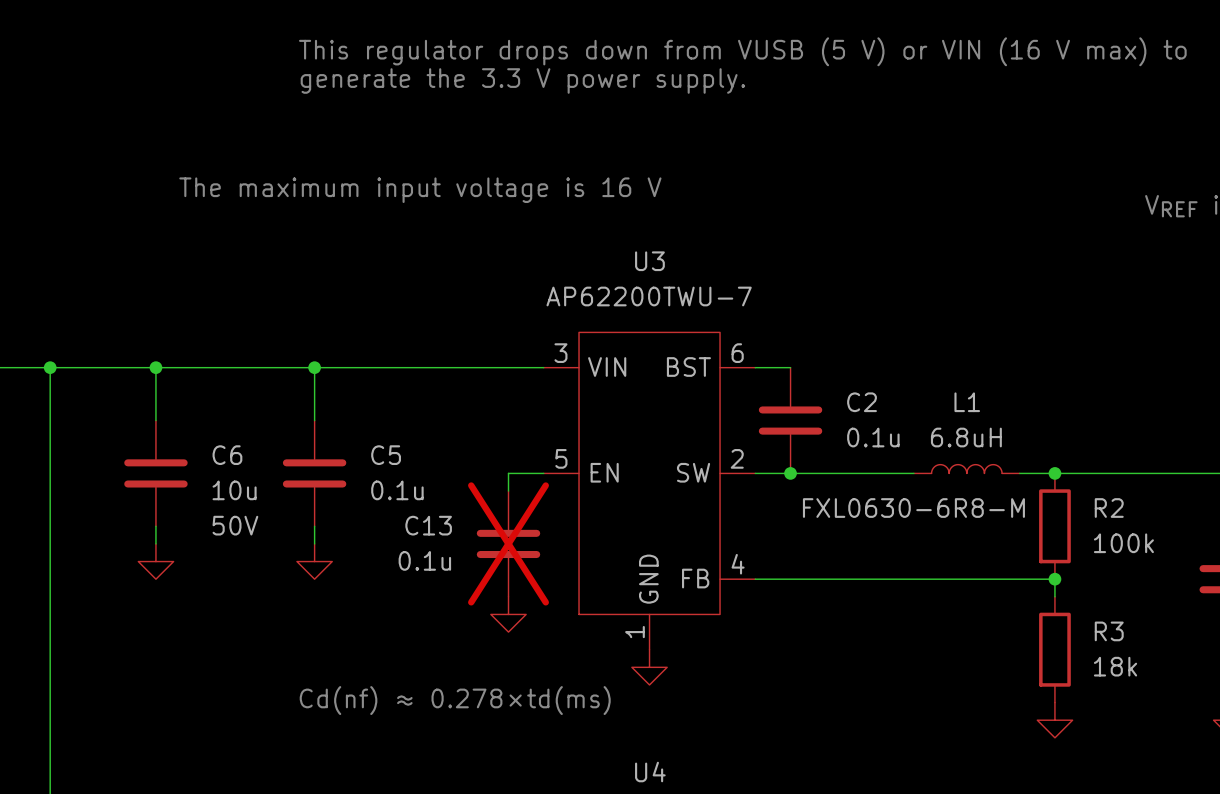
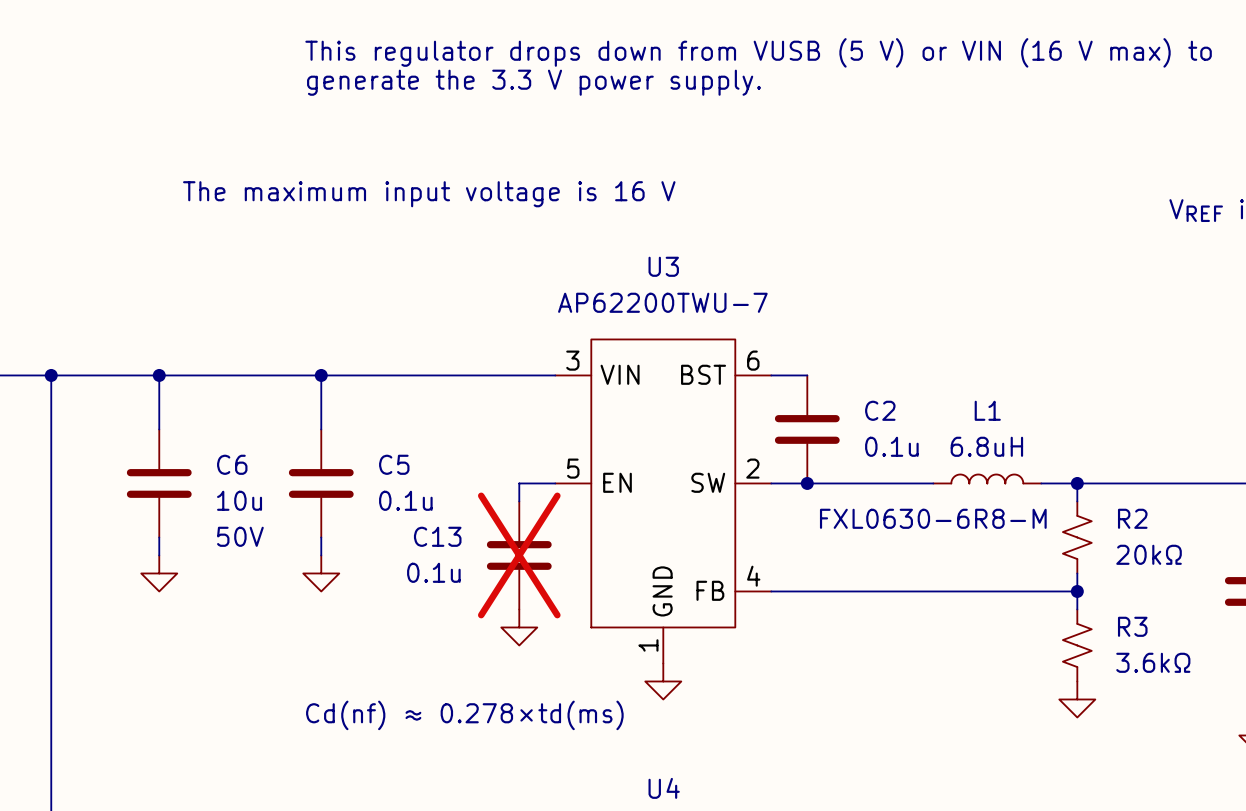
R2 symbol: [1039, 473, 1071, 580] -> [1062, 501, 1092, 574]
R2 value: 100k (1123, 543) -> 20kΩ (1149, 554)
R3 symbol: [1039, 596, 1071, 703] -> [1062, 609, 1092, 682]
R3 value: 18k (1115, 666) -> 3.6kΩ (1153, 662)
power symbol position: (1054, 720) -> (1077, 699)

